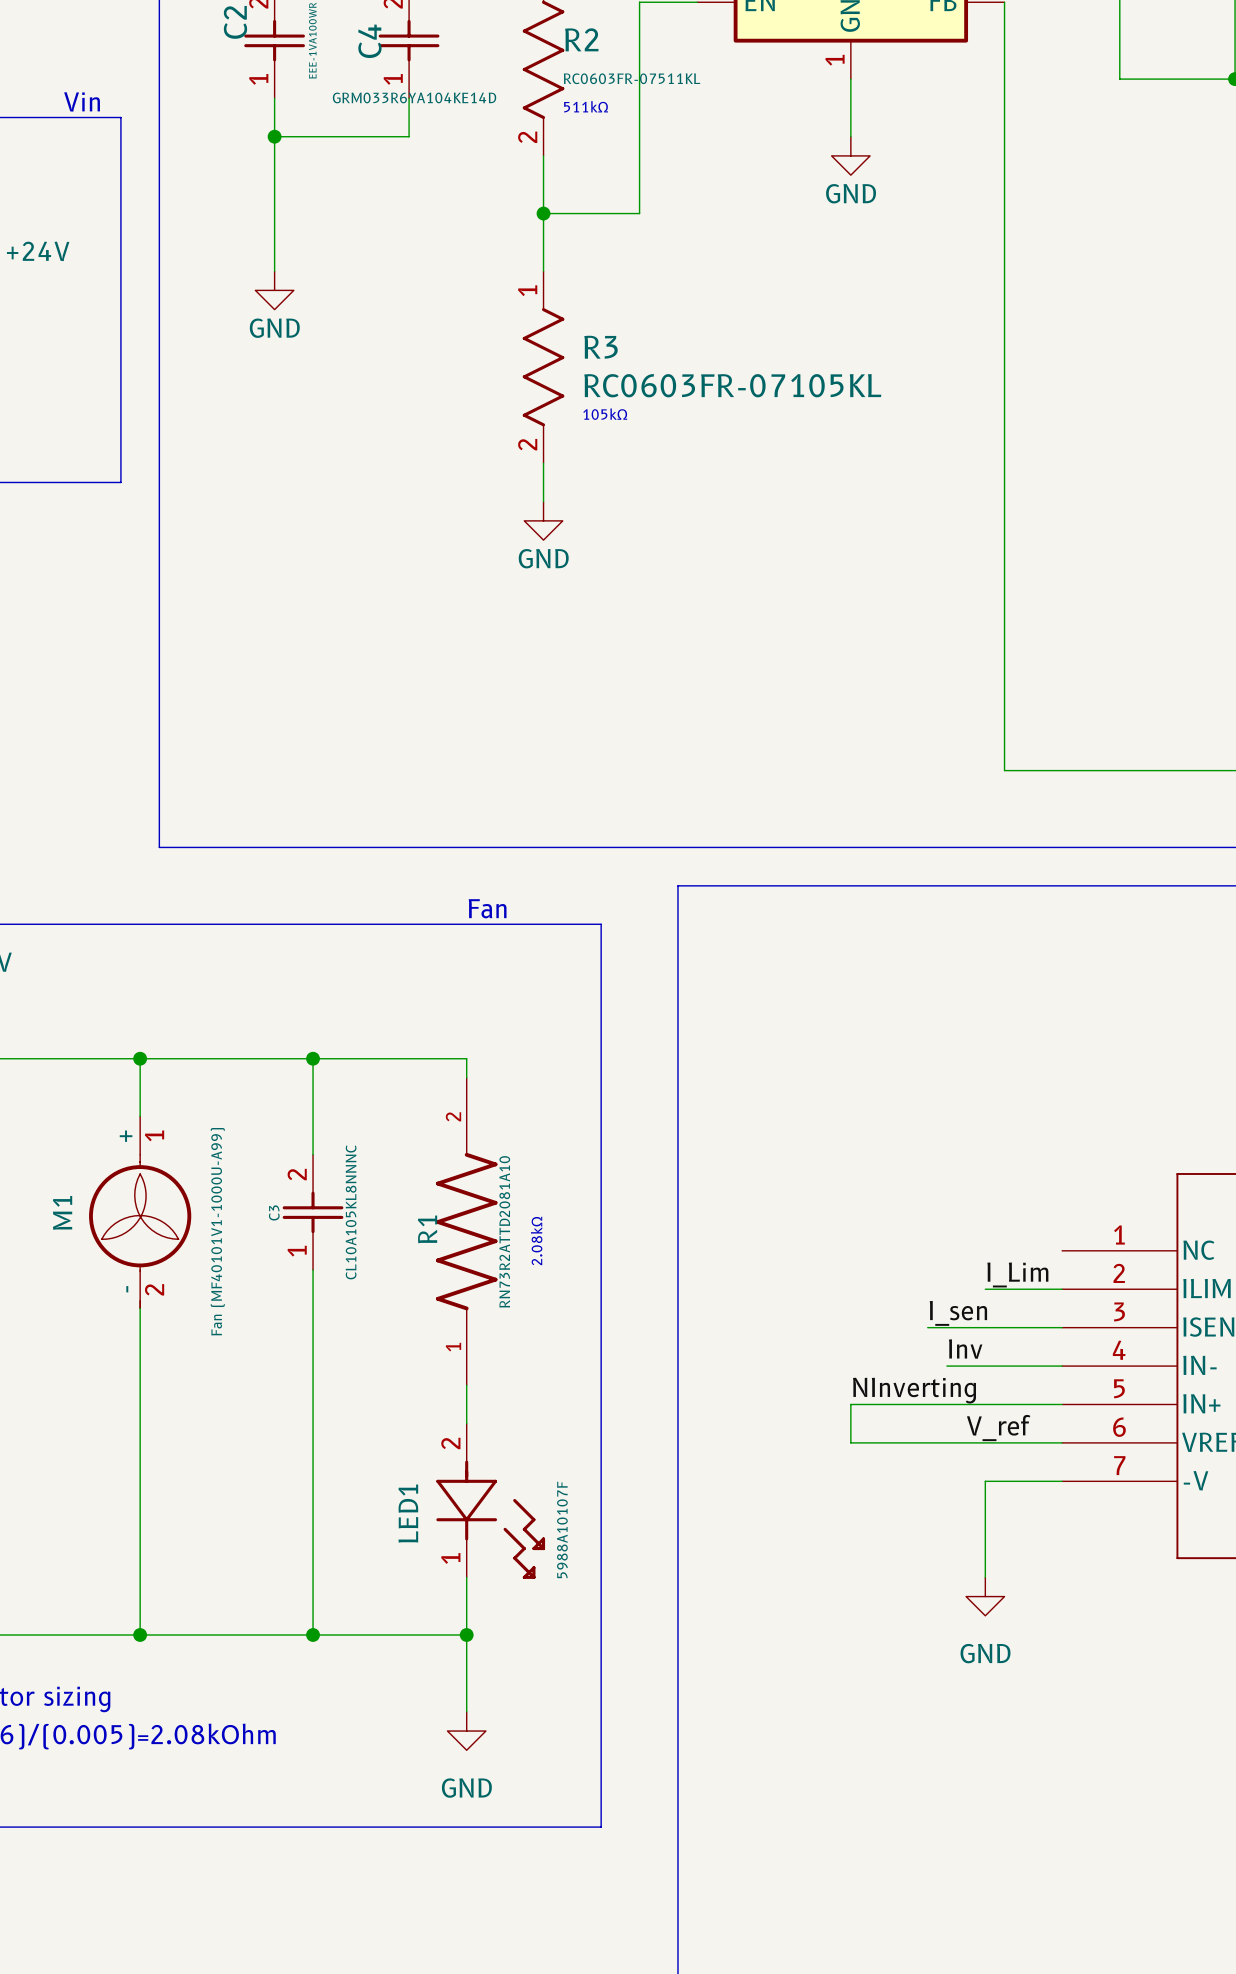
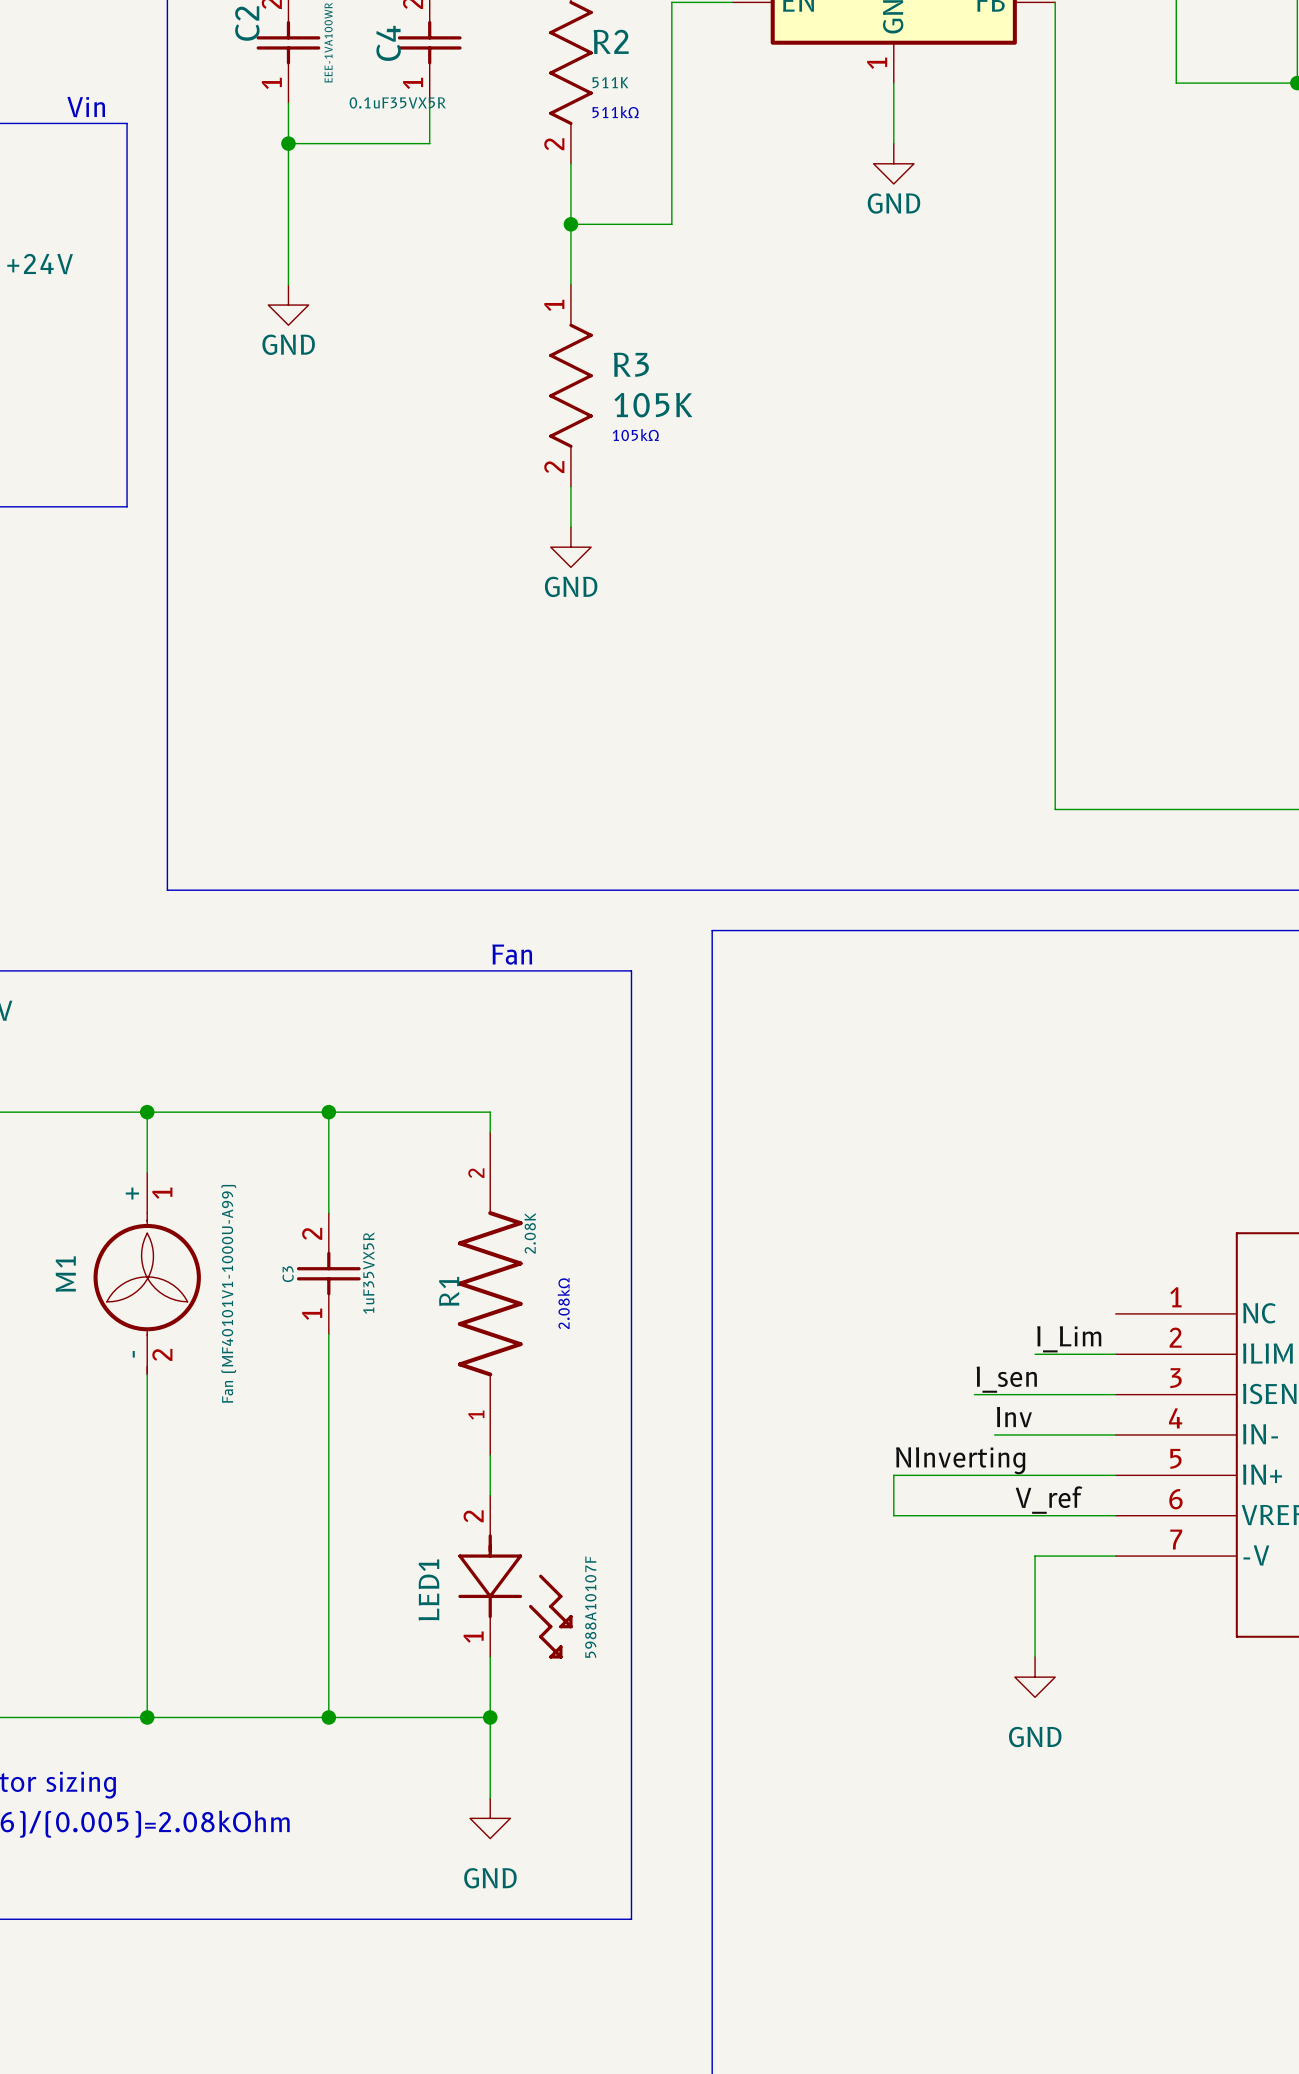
R2 value: RC0603FR-07511KL (632, 78) -> 511K (610, 82)
C4 value: GRM033R6YA104KE14D (414, 97) -> 0.1uF35VX5R (397, 102)
R3 value: RC0603FR-07105KL (732, 385) -> 105K (653, 405)
C3 value: CL10A105KL8NNNC (351, 1212) -> 1uF35VX5R (368, 1273)
R1 value: RN73R2ATTD2081A10 (504, 1231) -> 2.08K (530, 1233)

